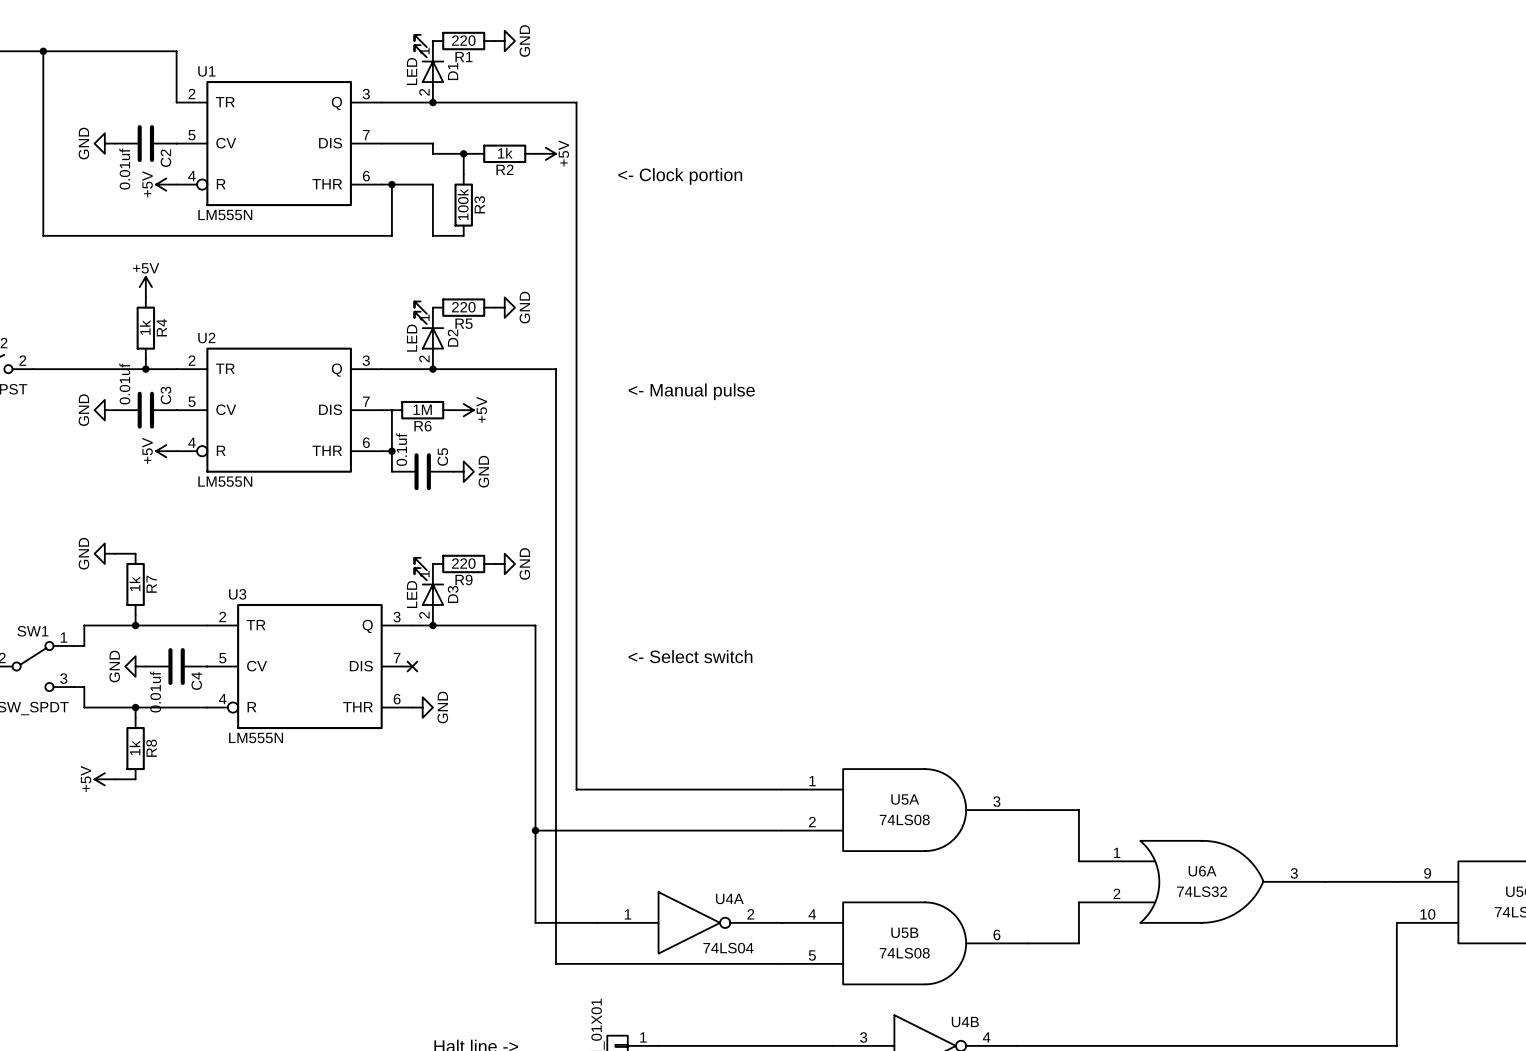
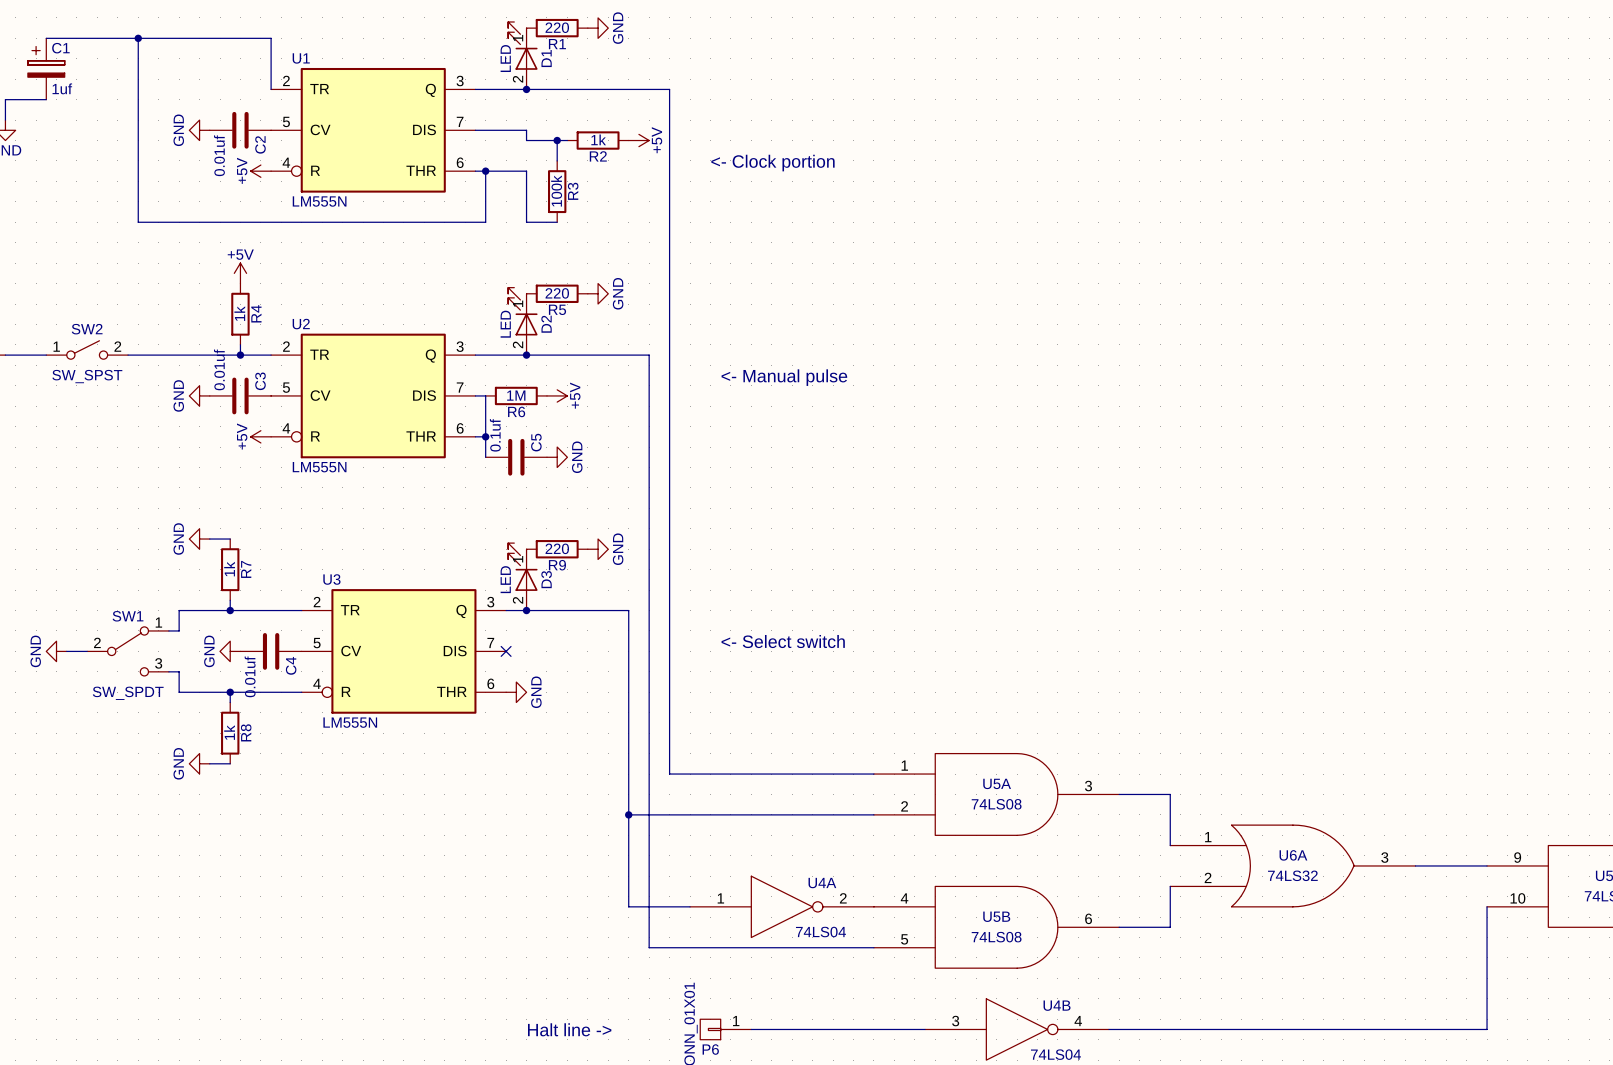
power symbol: +5V (104, 779) -> GND (199, 763)

